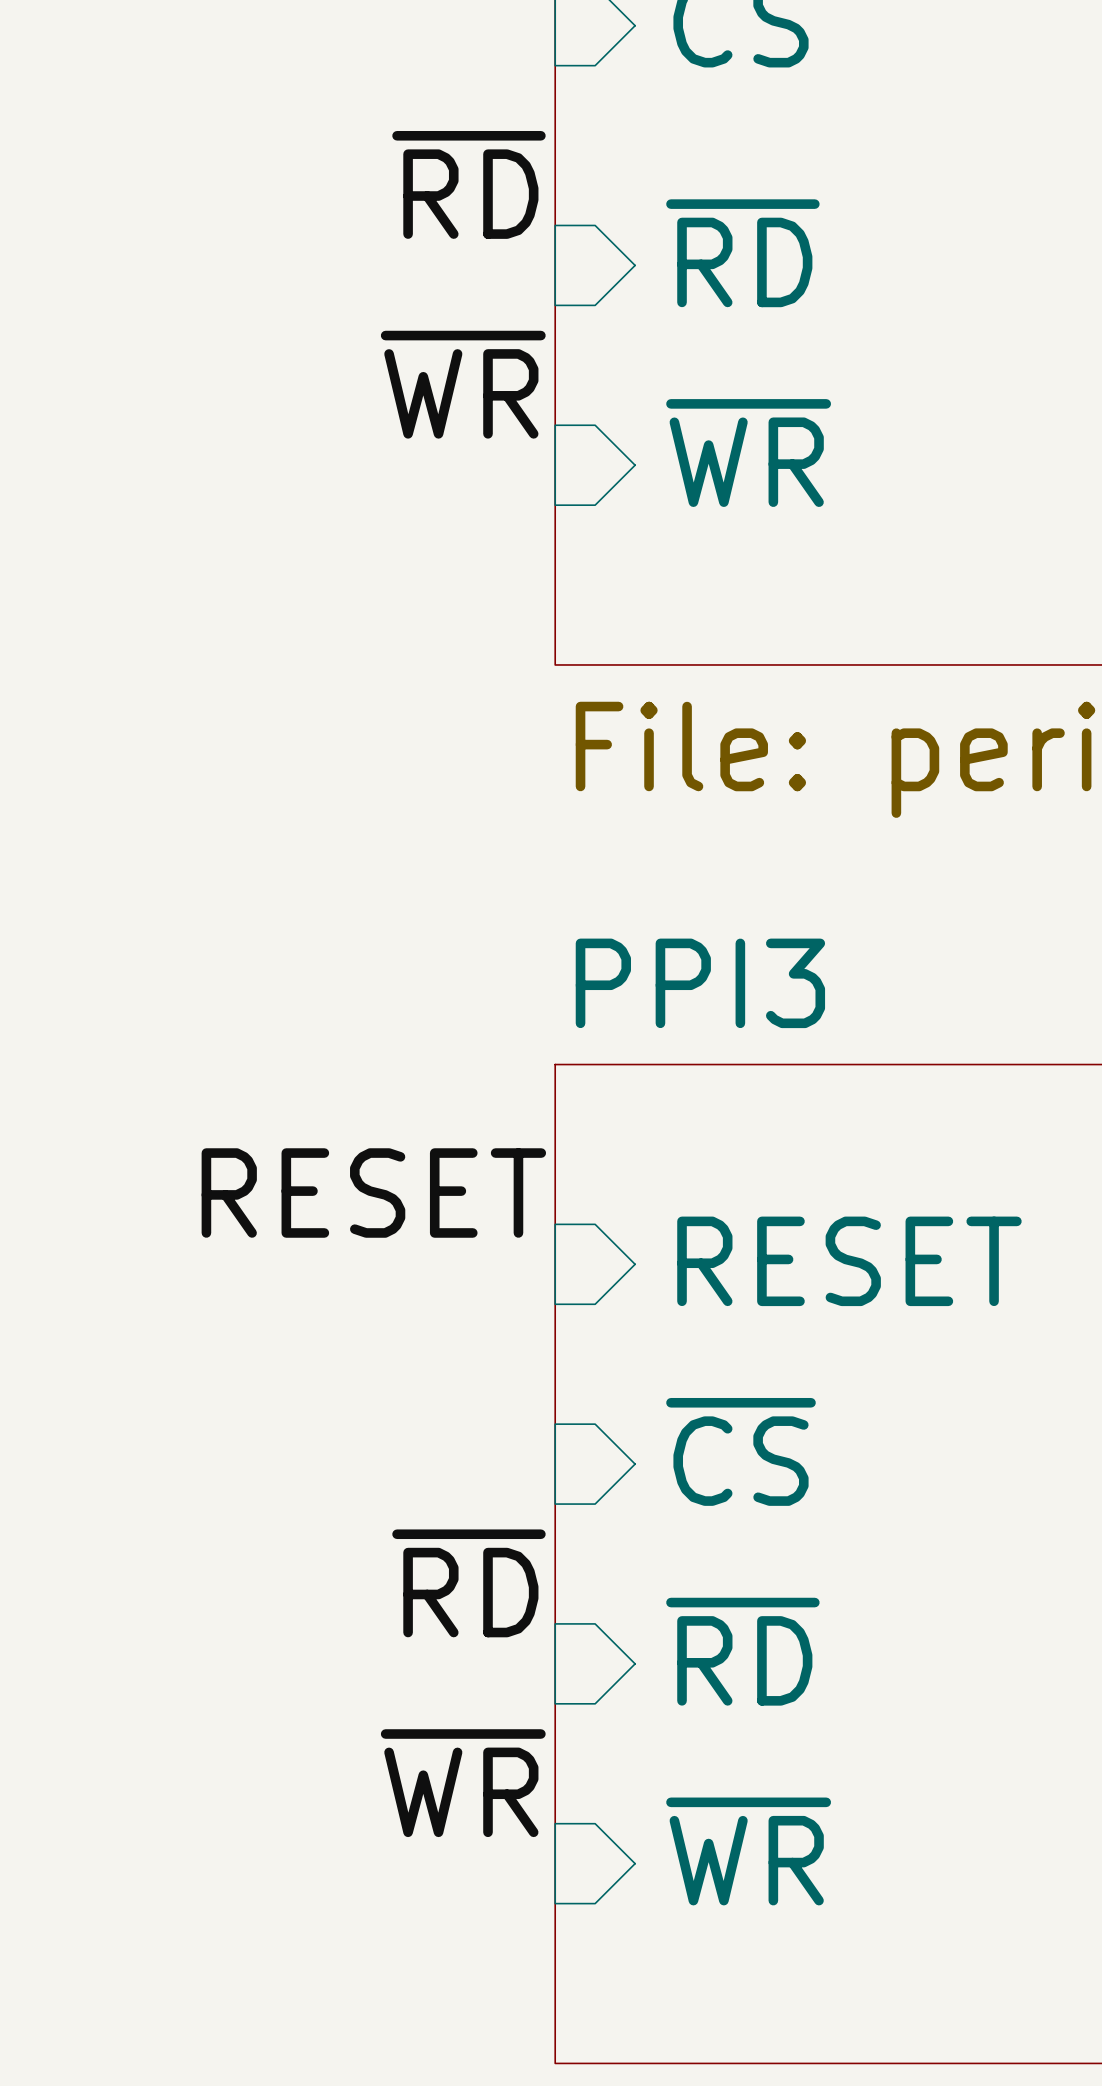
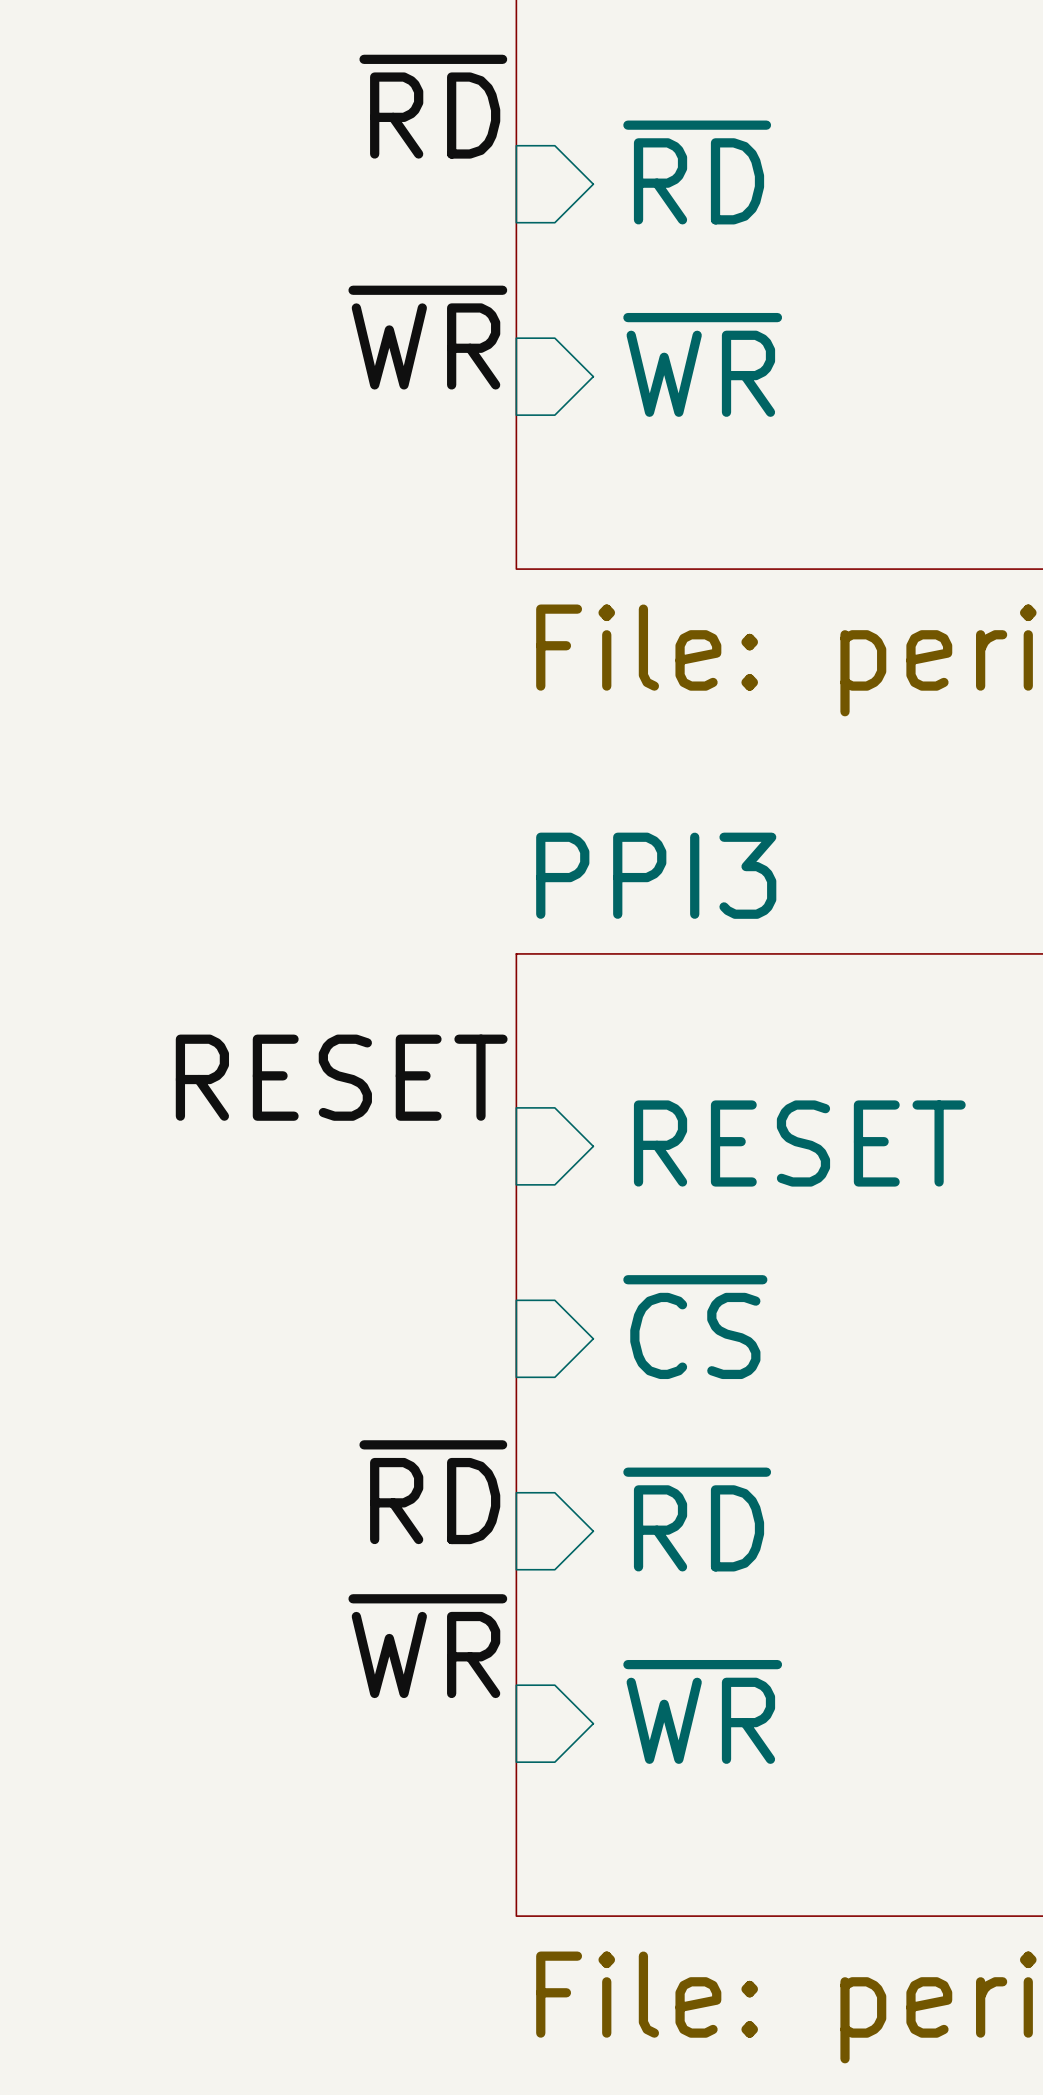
label position: ~{WR} (463, 384) -> ~{WR} (427, 337)
label position: ~{RD} (468, 1583) -> ~{RD} (433, 1492)

